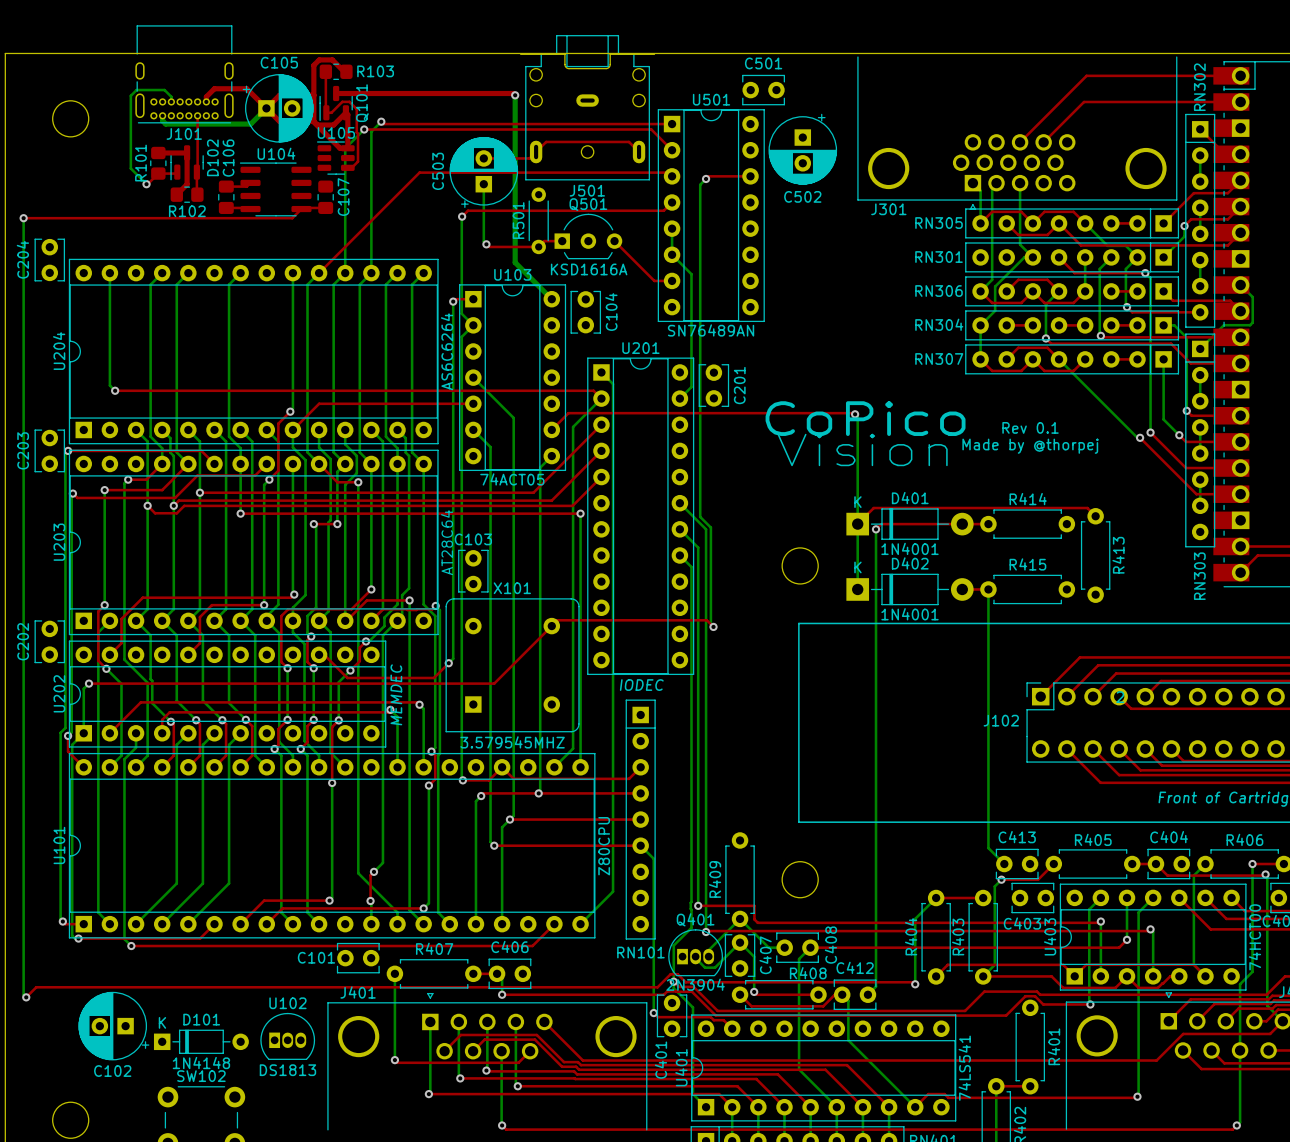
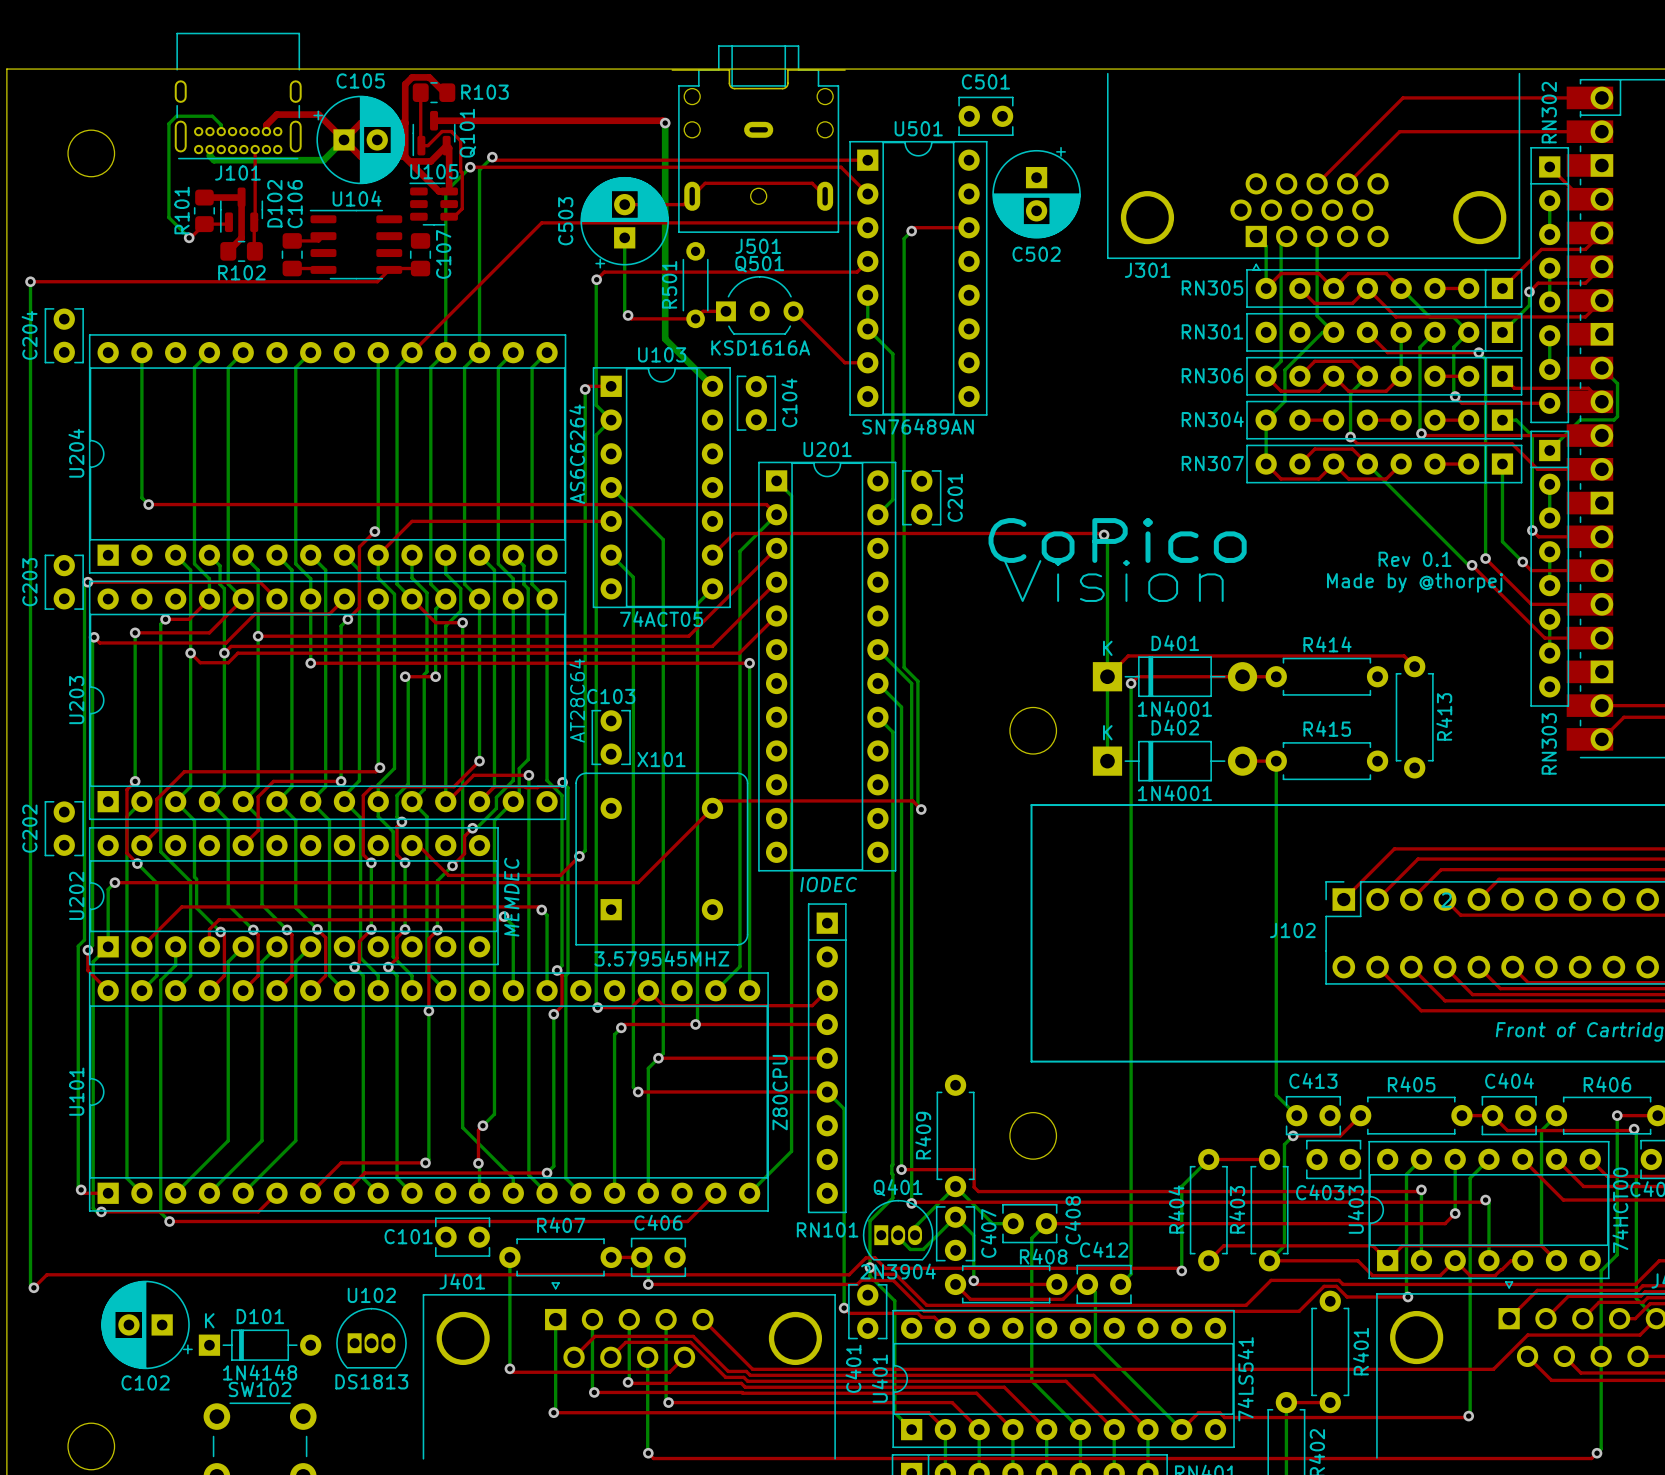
text position: Rev 0.1 (1030, 427) -> Rev 0.1 (1415, 559)
text position: Made by @thorpej (1030, 446) -> Made by @thorpej (1415, 582)

